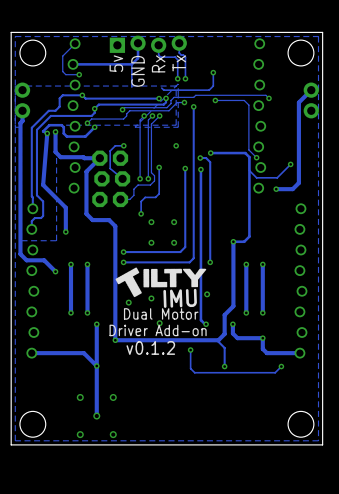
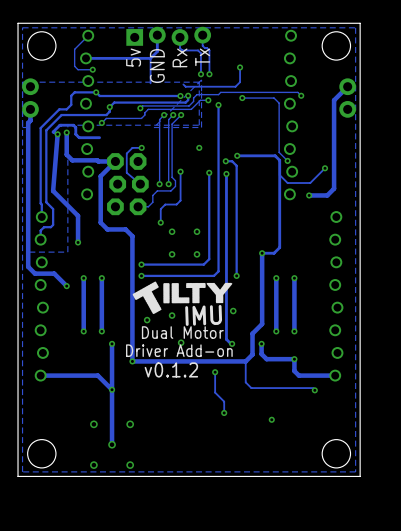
track: (94, 127) (85, 136) -> none
via: (94, 127) -> none
track: (218, 341) (224, 347) (224, 366) -> (245, 363) (245, 382) (251, 388) (313, 388)
via: (224, 366) -> none
track: (281, 366) (275, 372) (194, 372) -> (224, 412) (224, 401) (219, 397)
via: none -> (224, 412)
via: none -> (271, 419)

